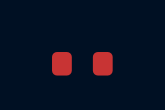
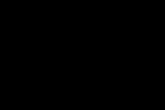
part: (82, 63) -> none

